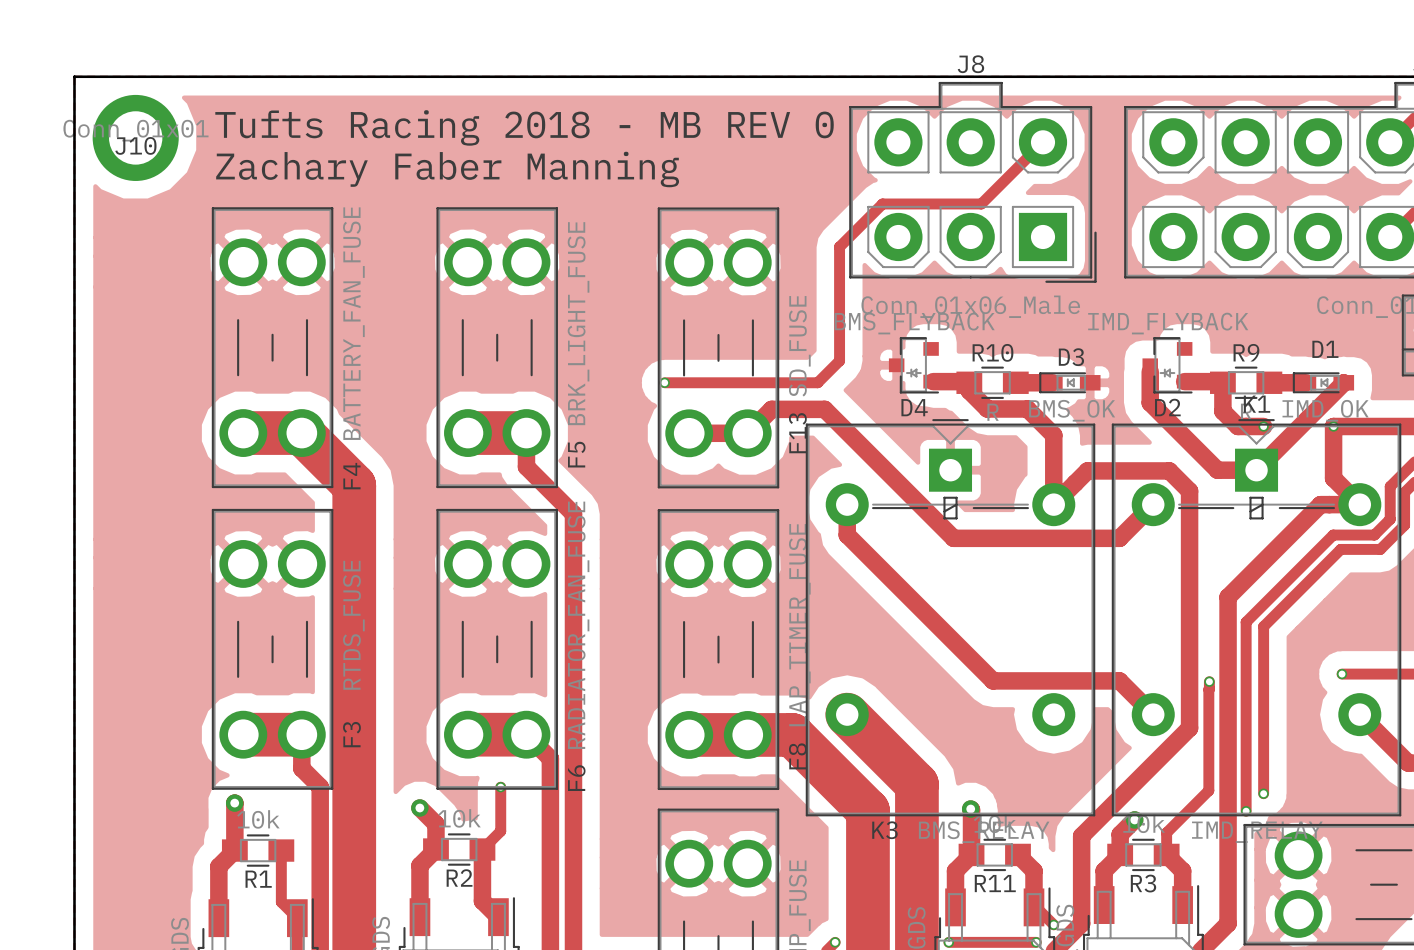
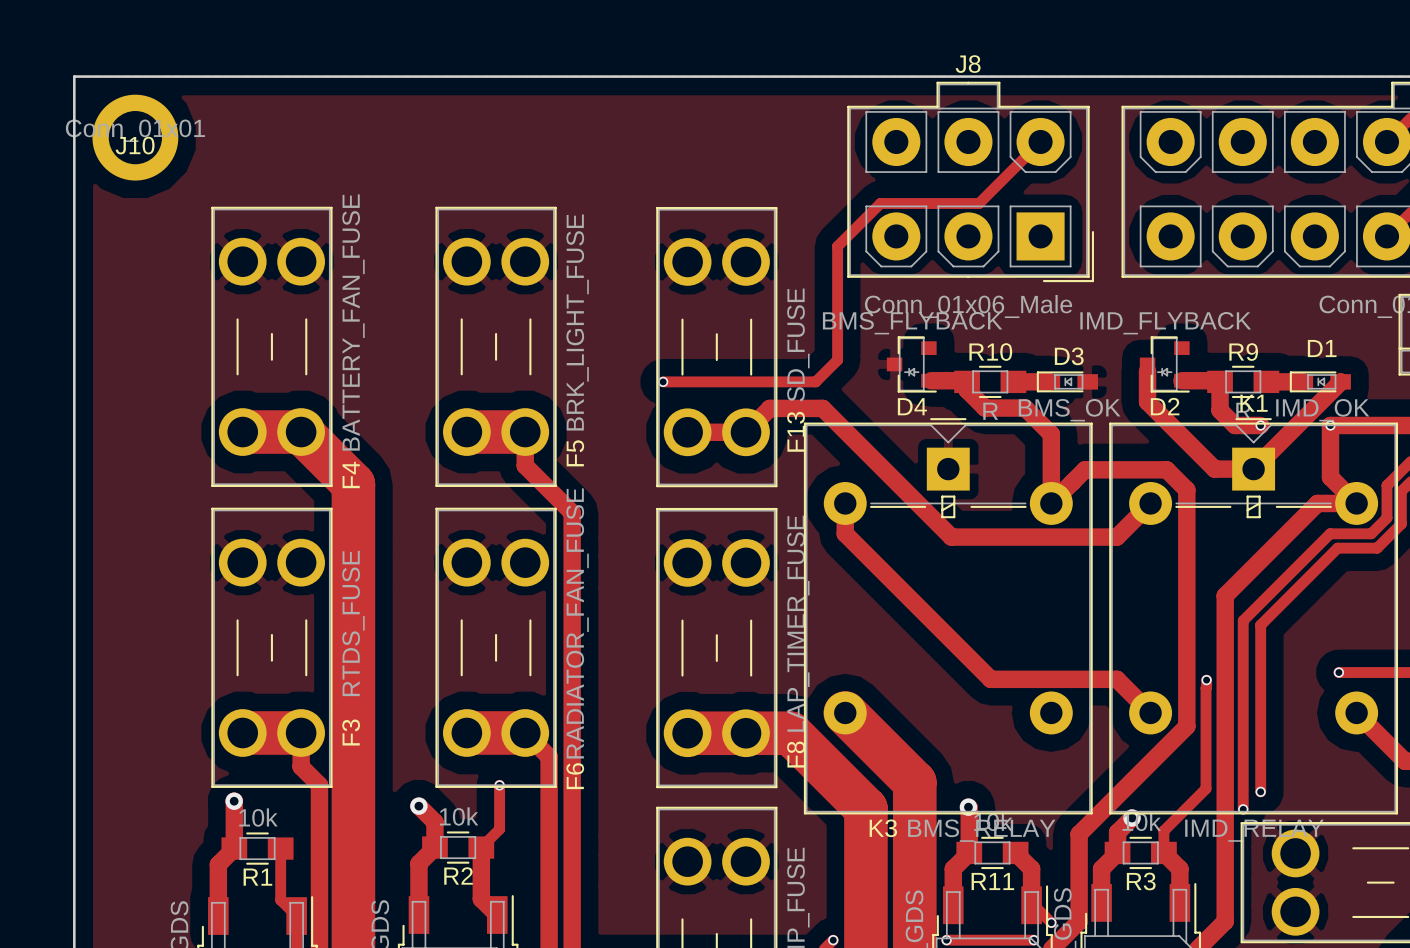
text: Tufts Racing 2018 - MB REV 0 (524, 127) -> none
text: Zachary Faber Manning (447, 169) -> none

